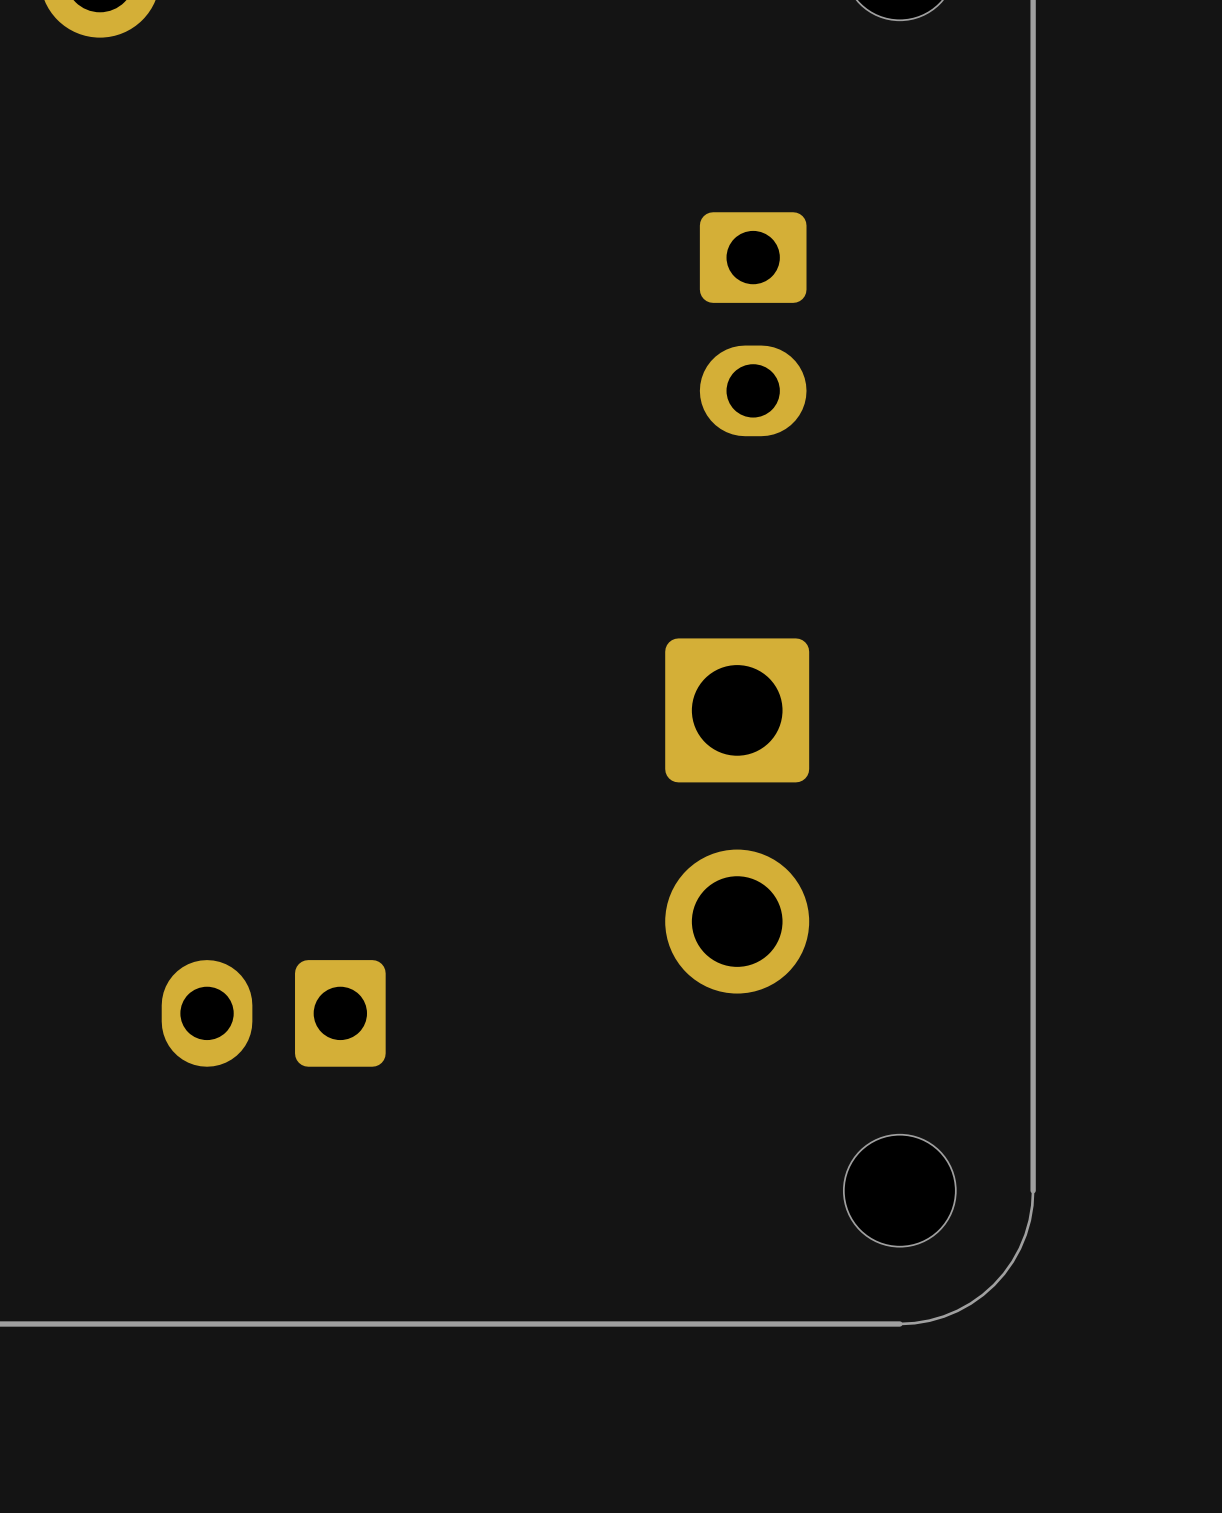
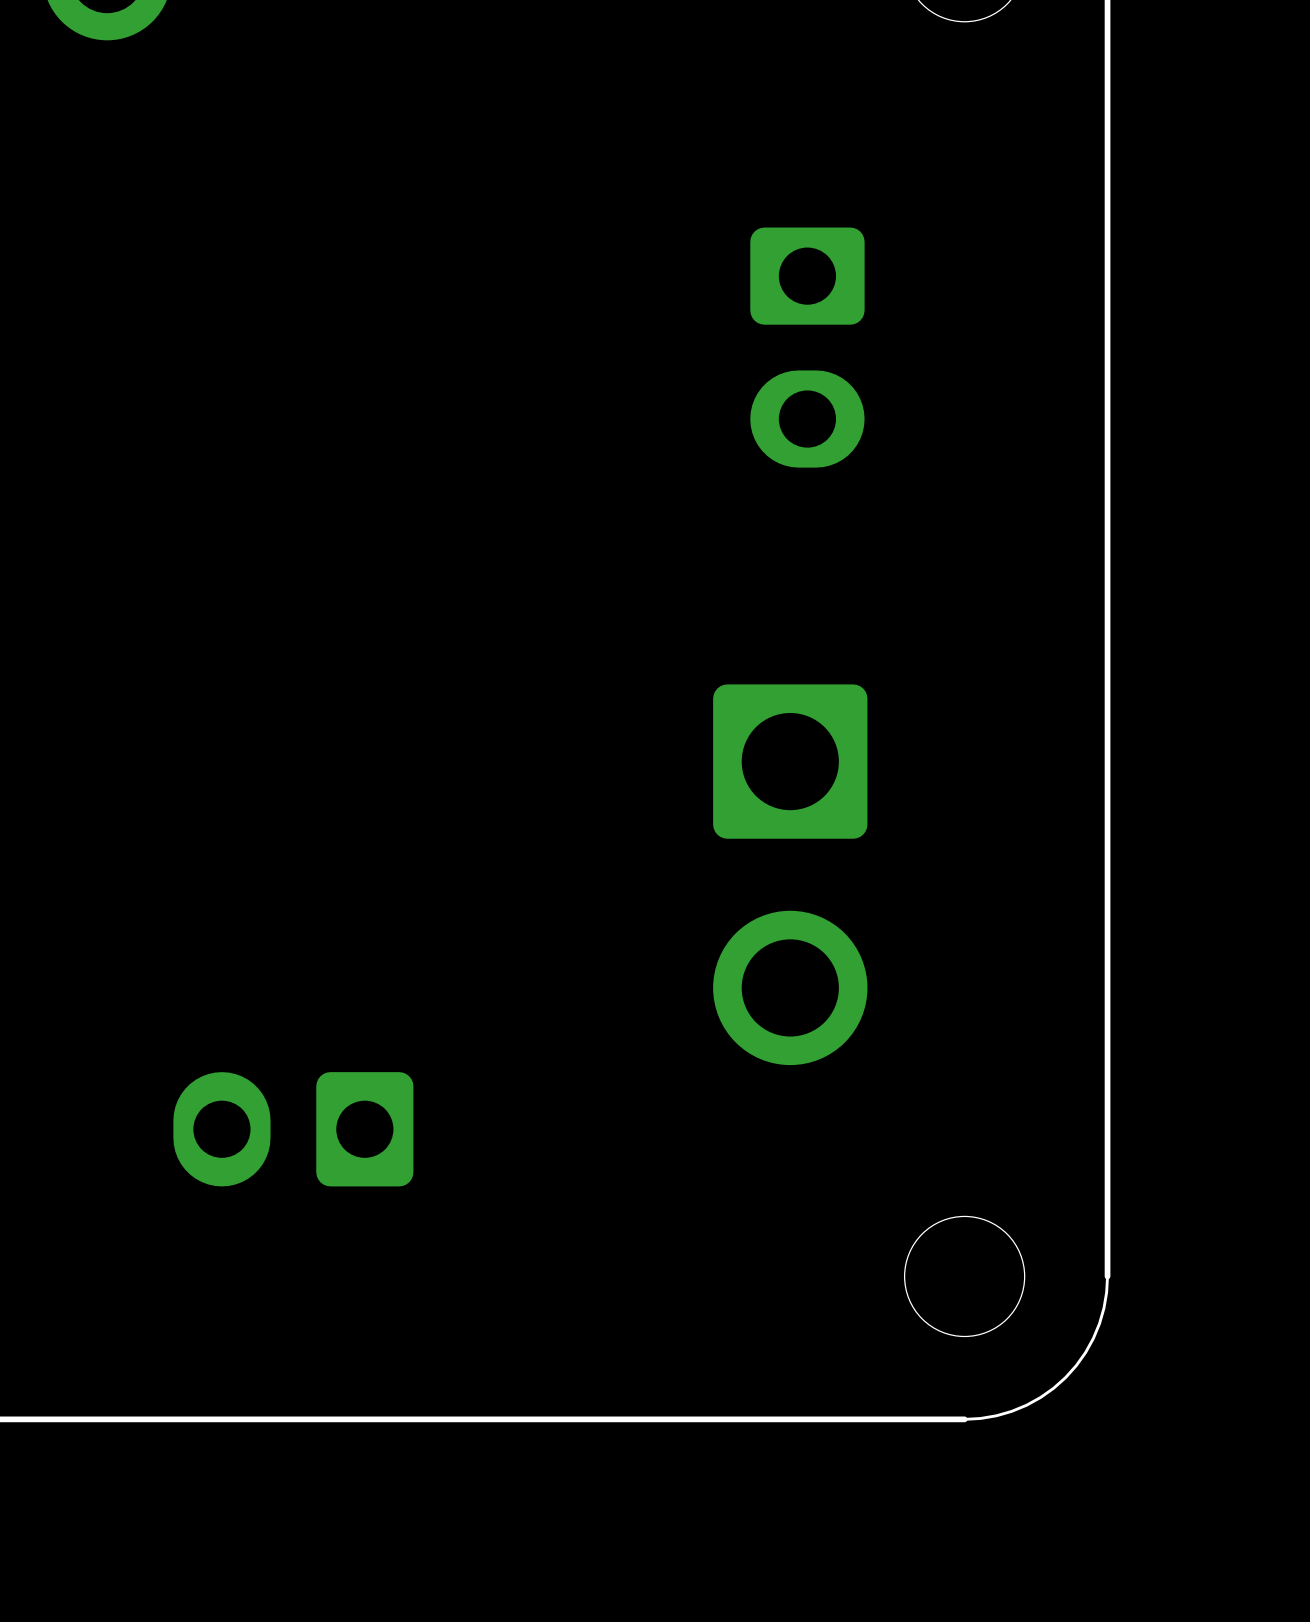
part position: (273, 1013) -> (293, 1129)

